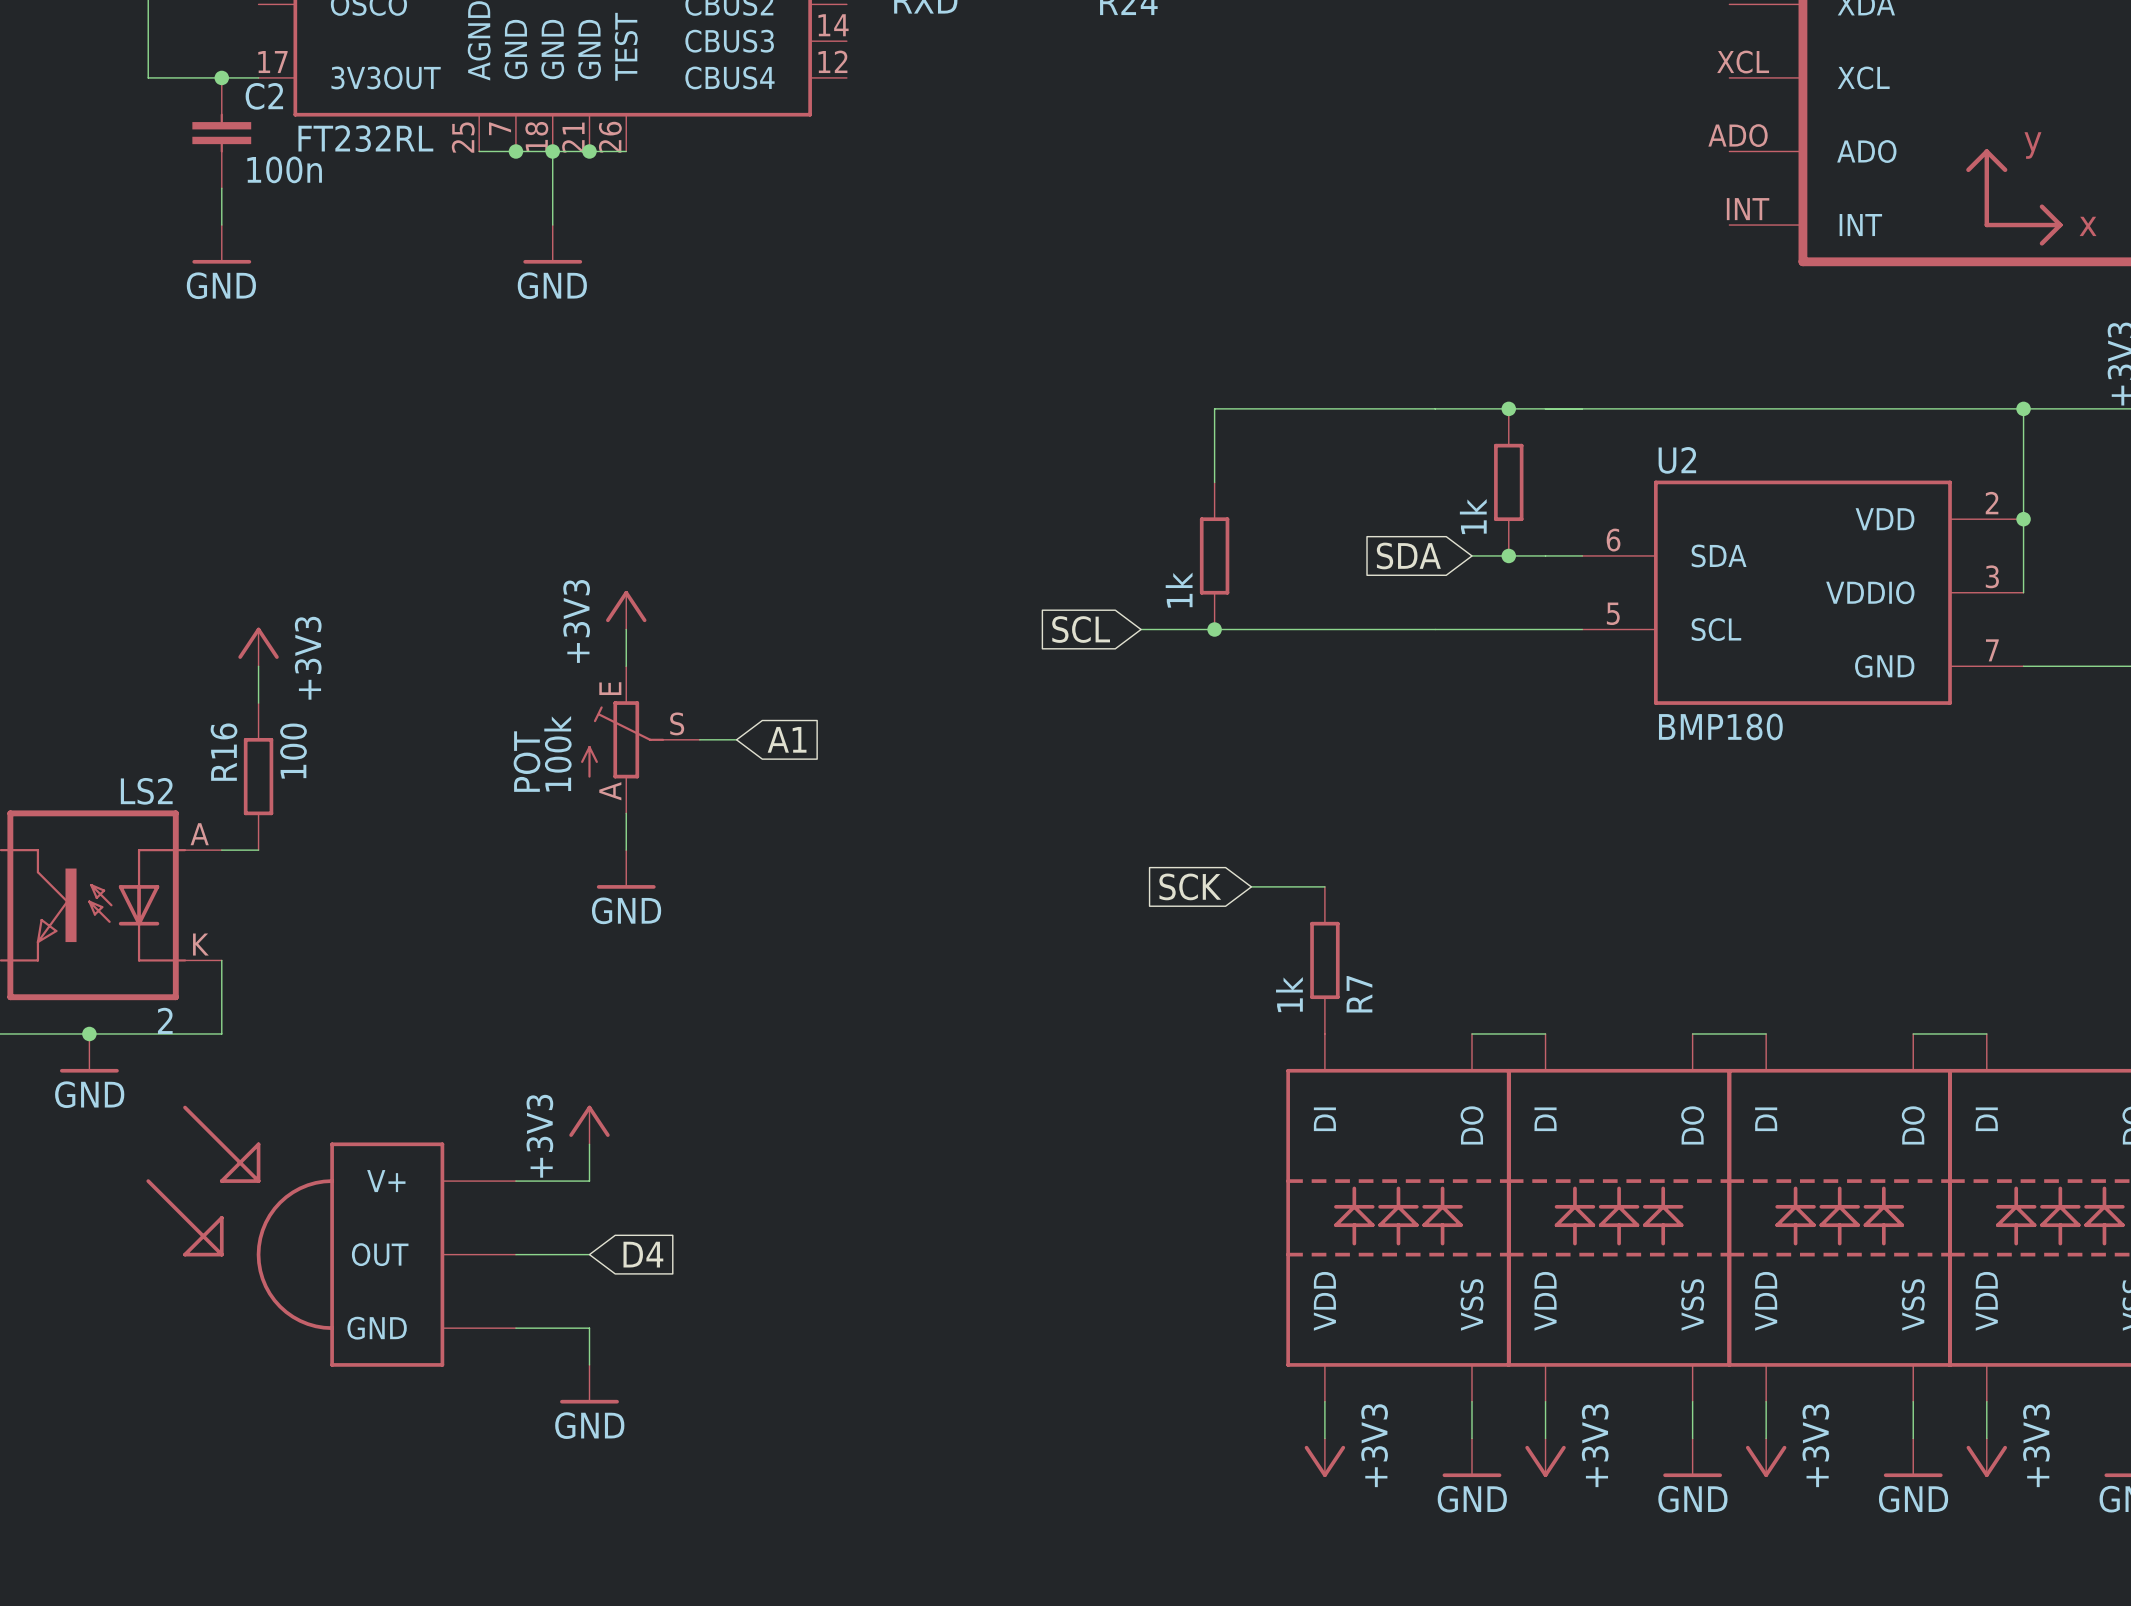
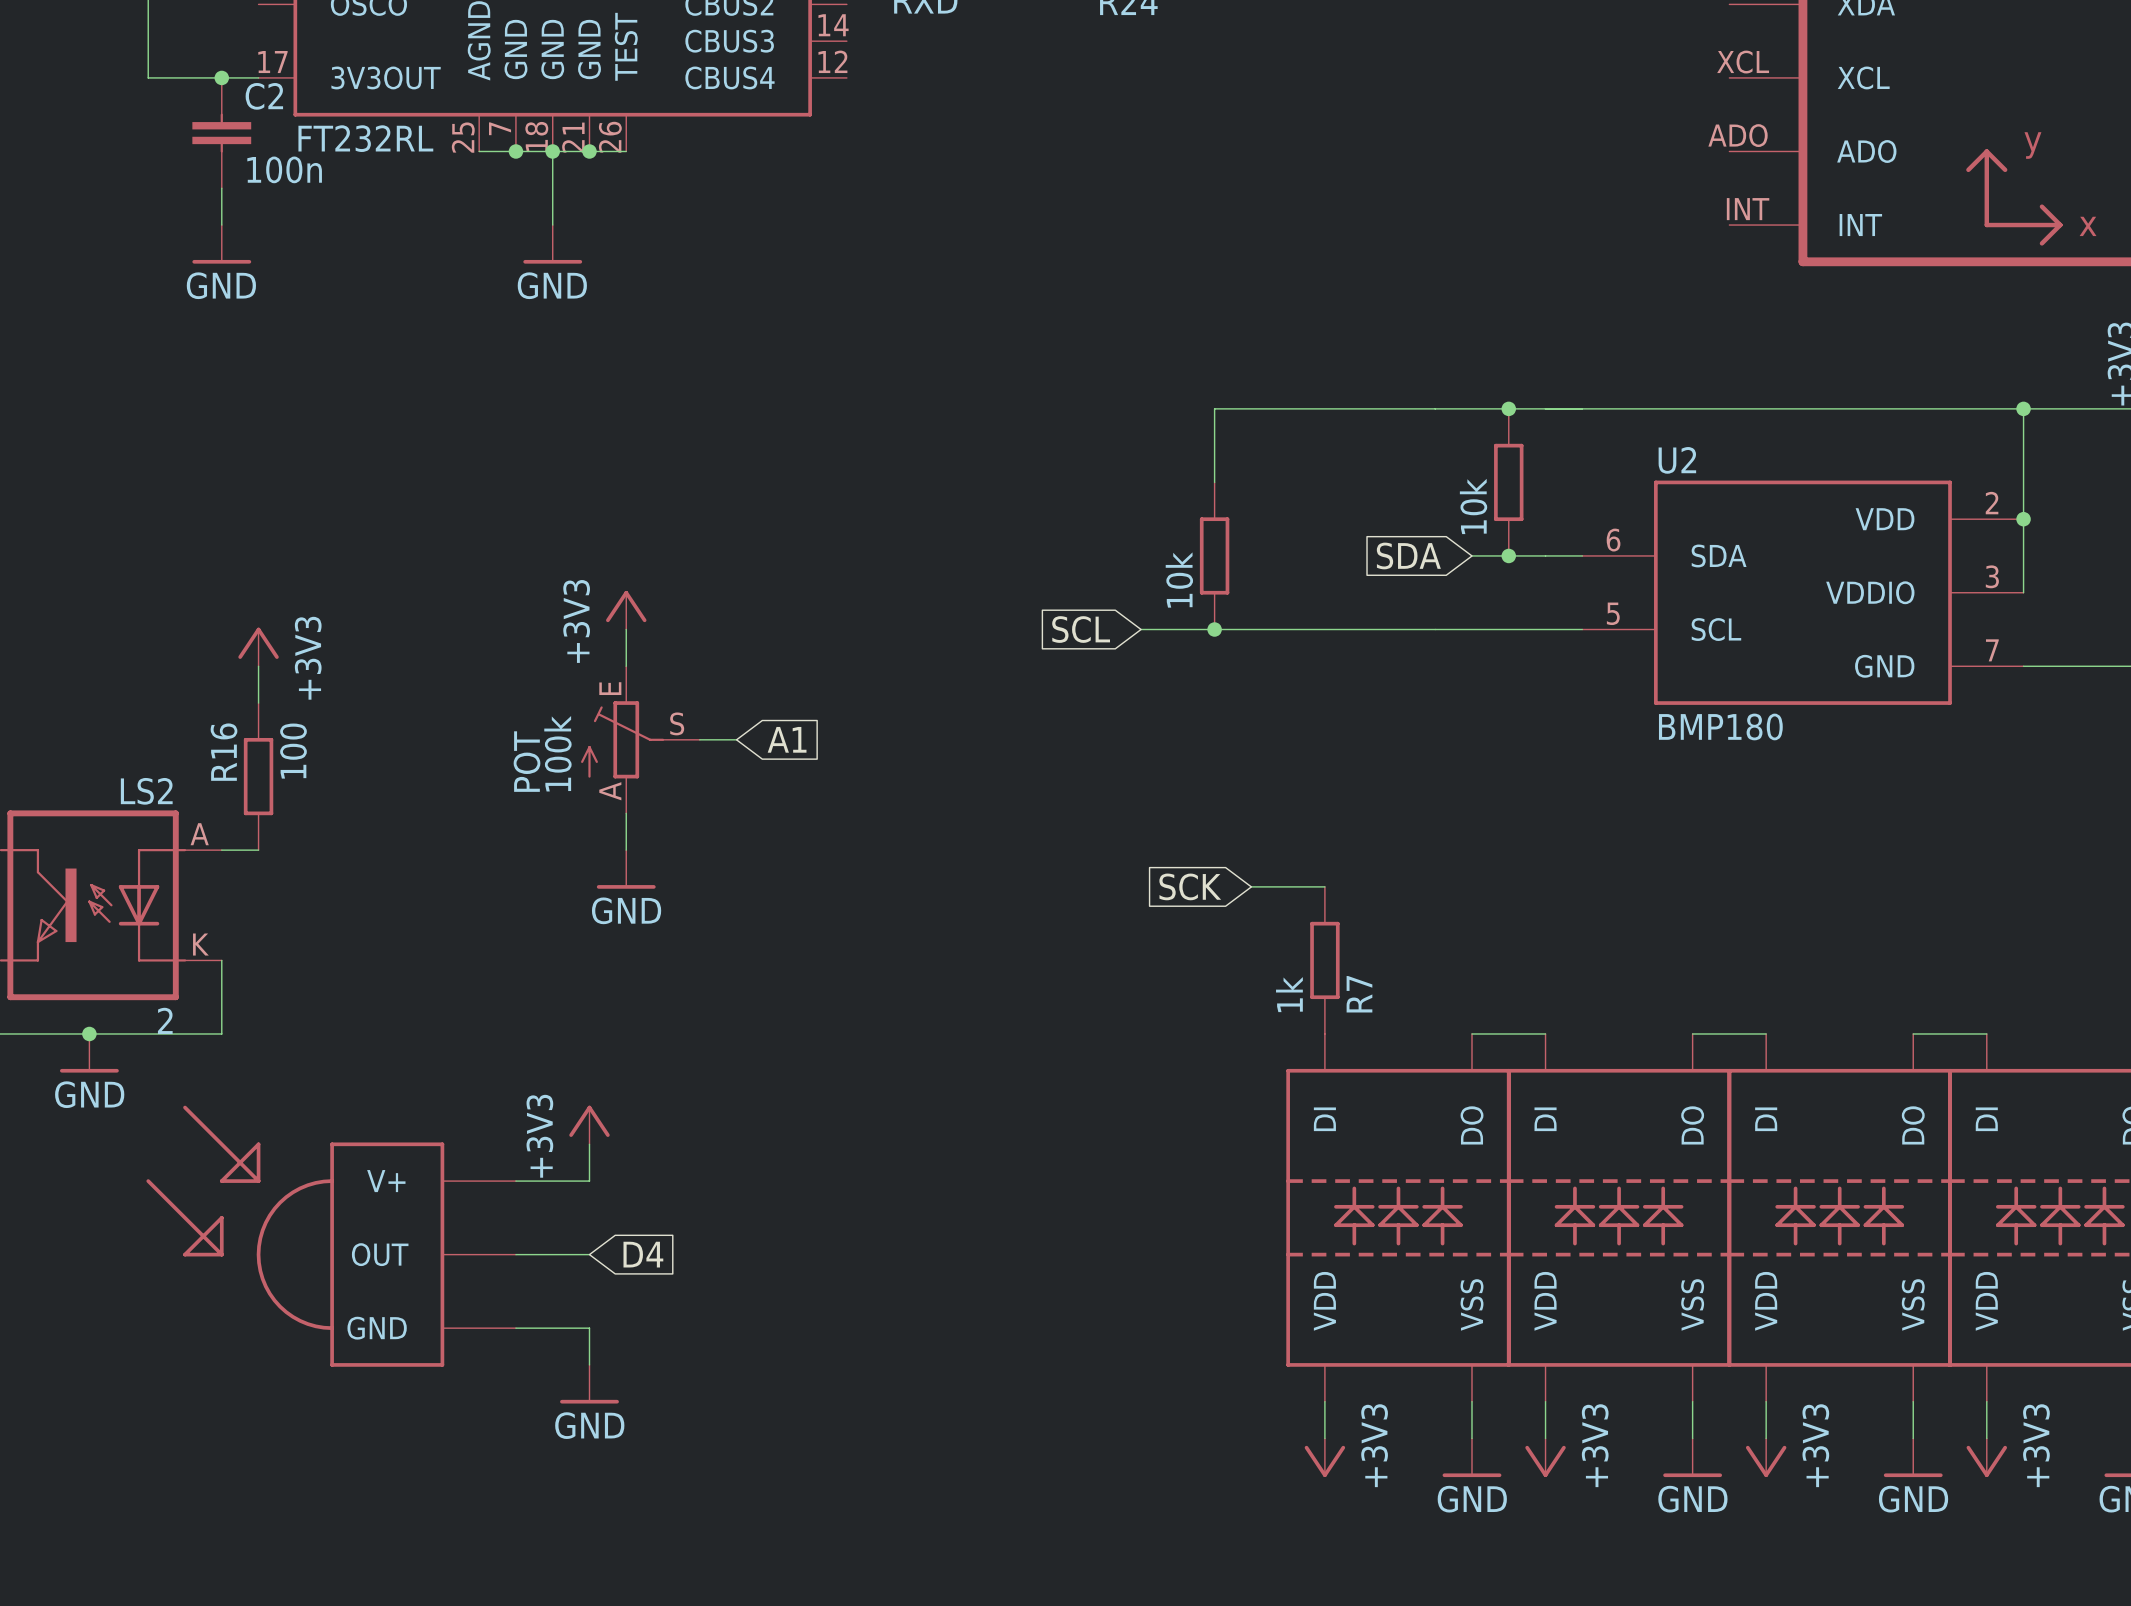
part value: 1k (1473, 516) -> 10k (1473, 506)
part value: 1k (1179, 590) -> 10k (1179, 580)

